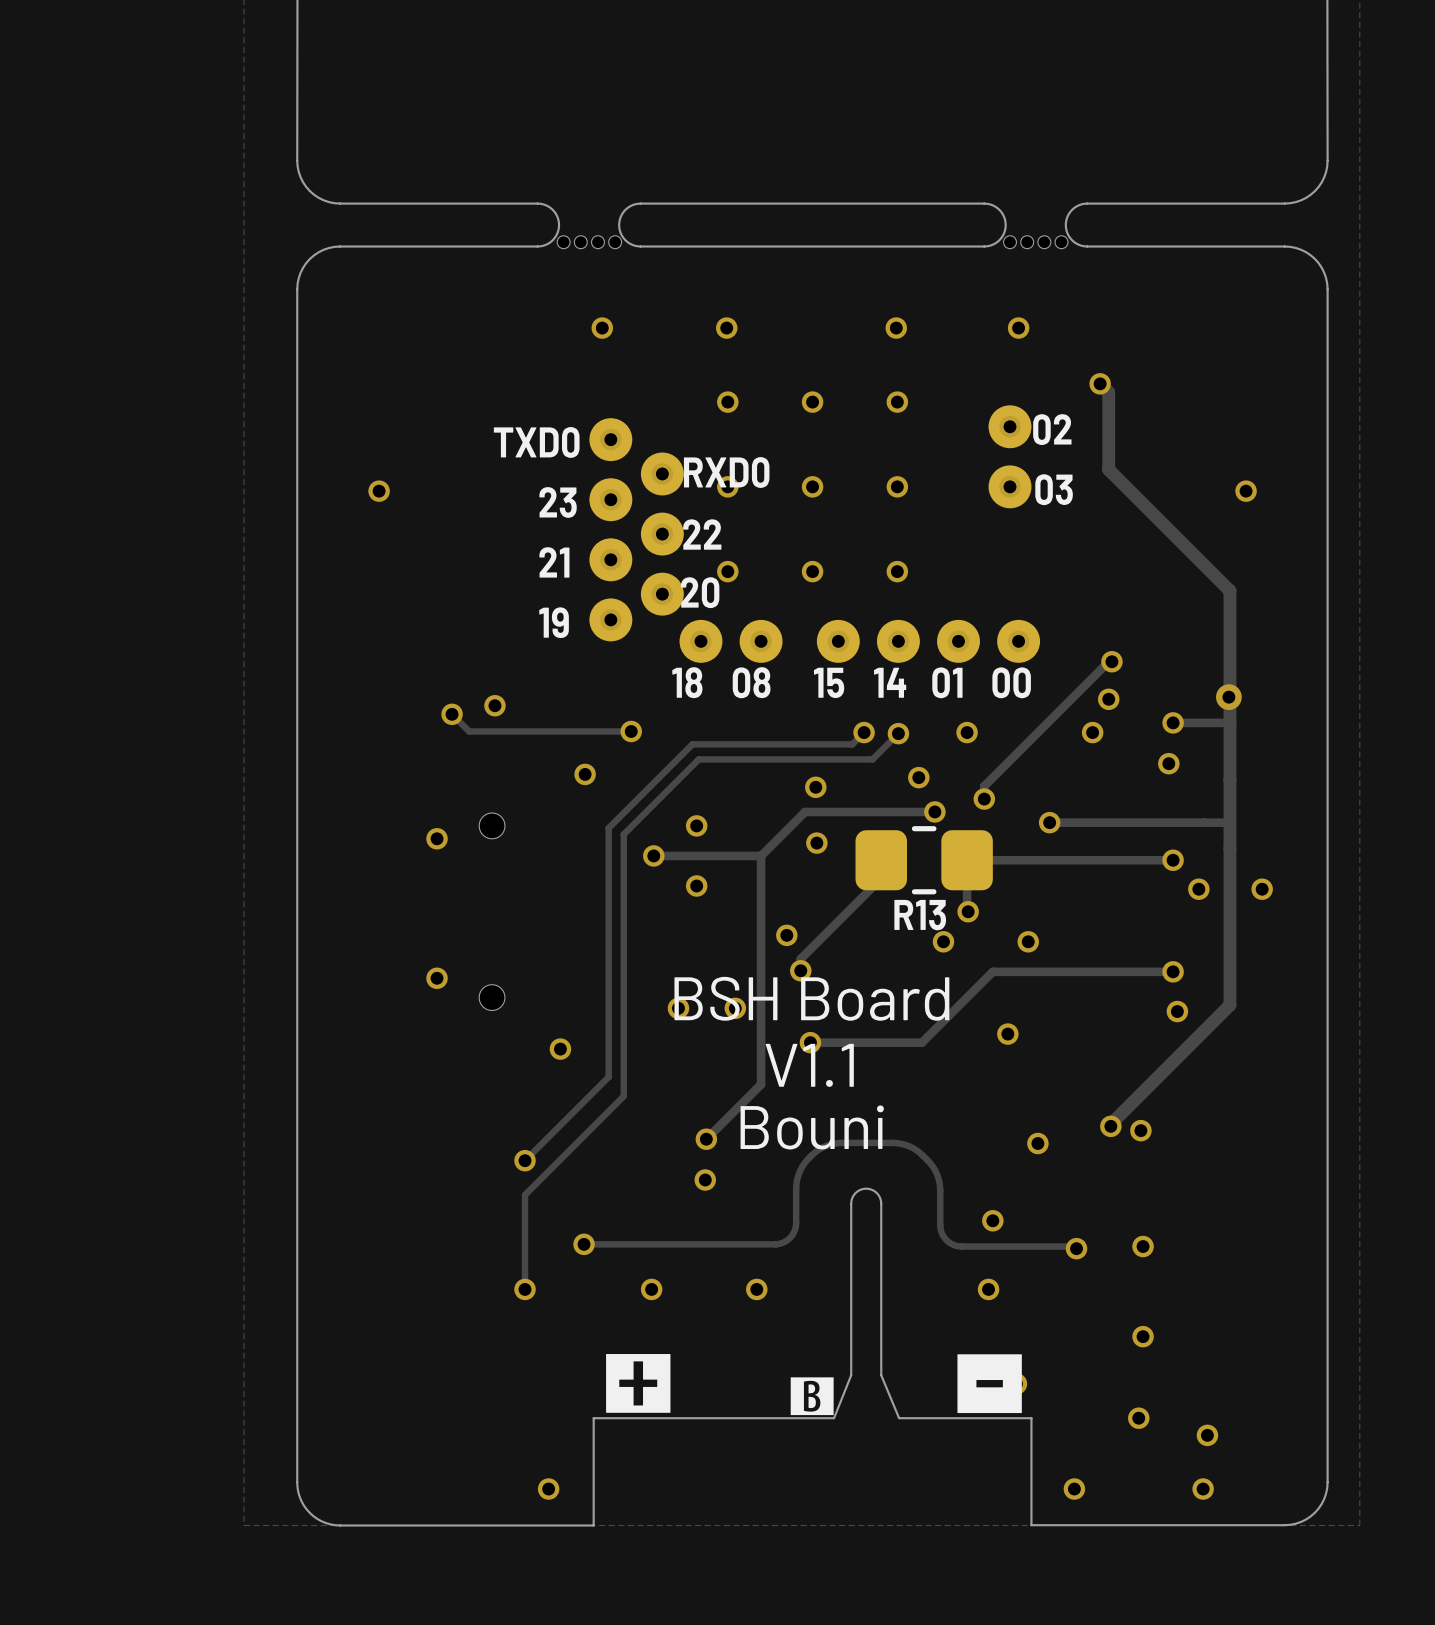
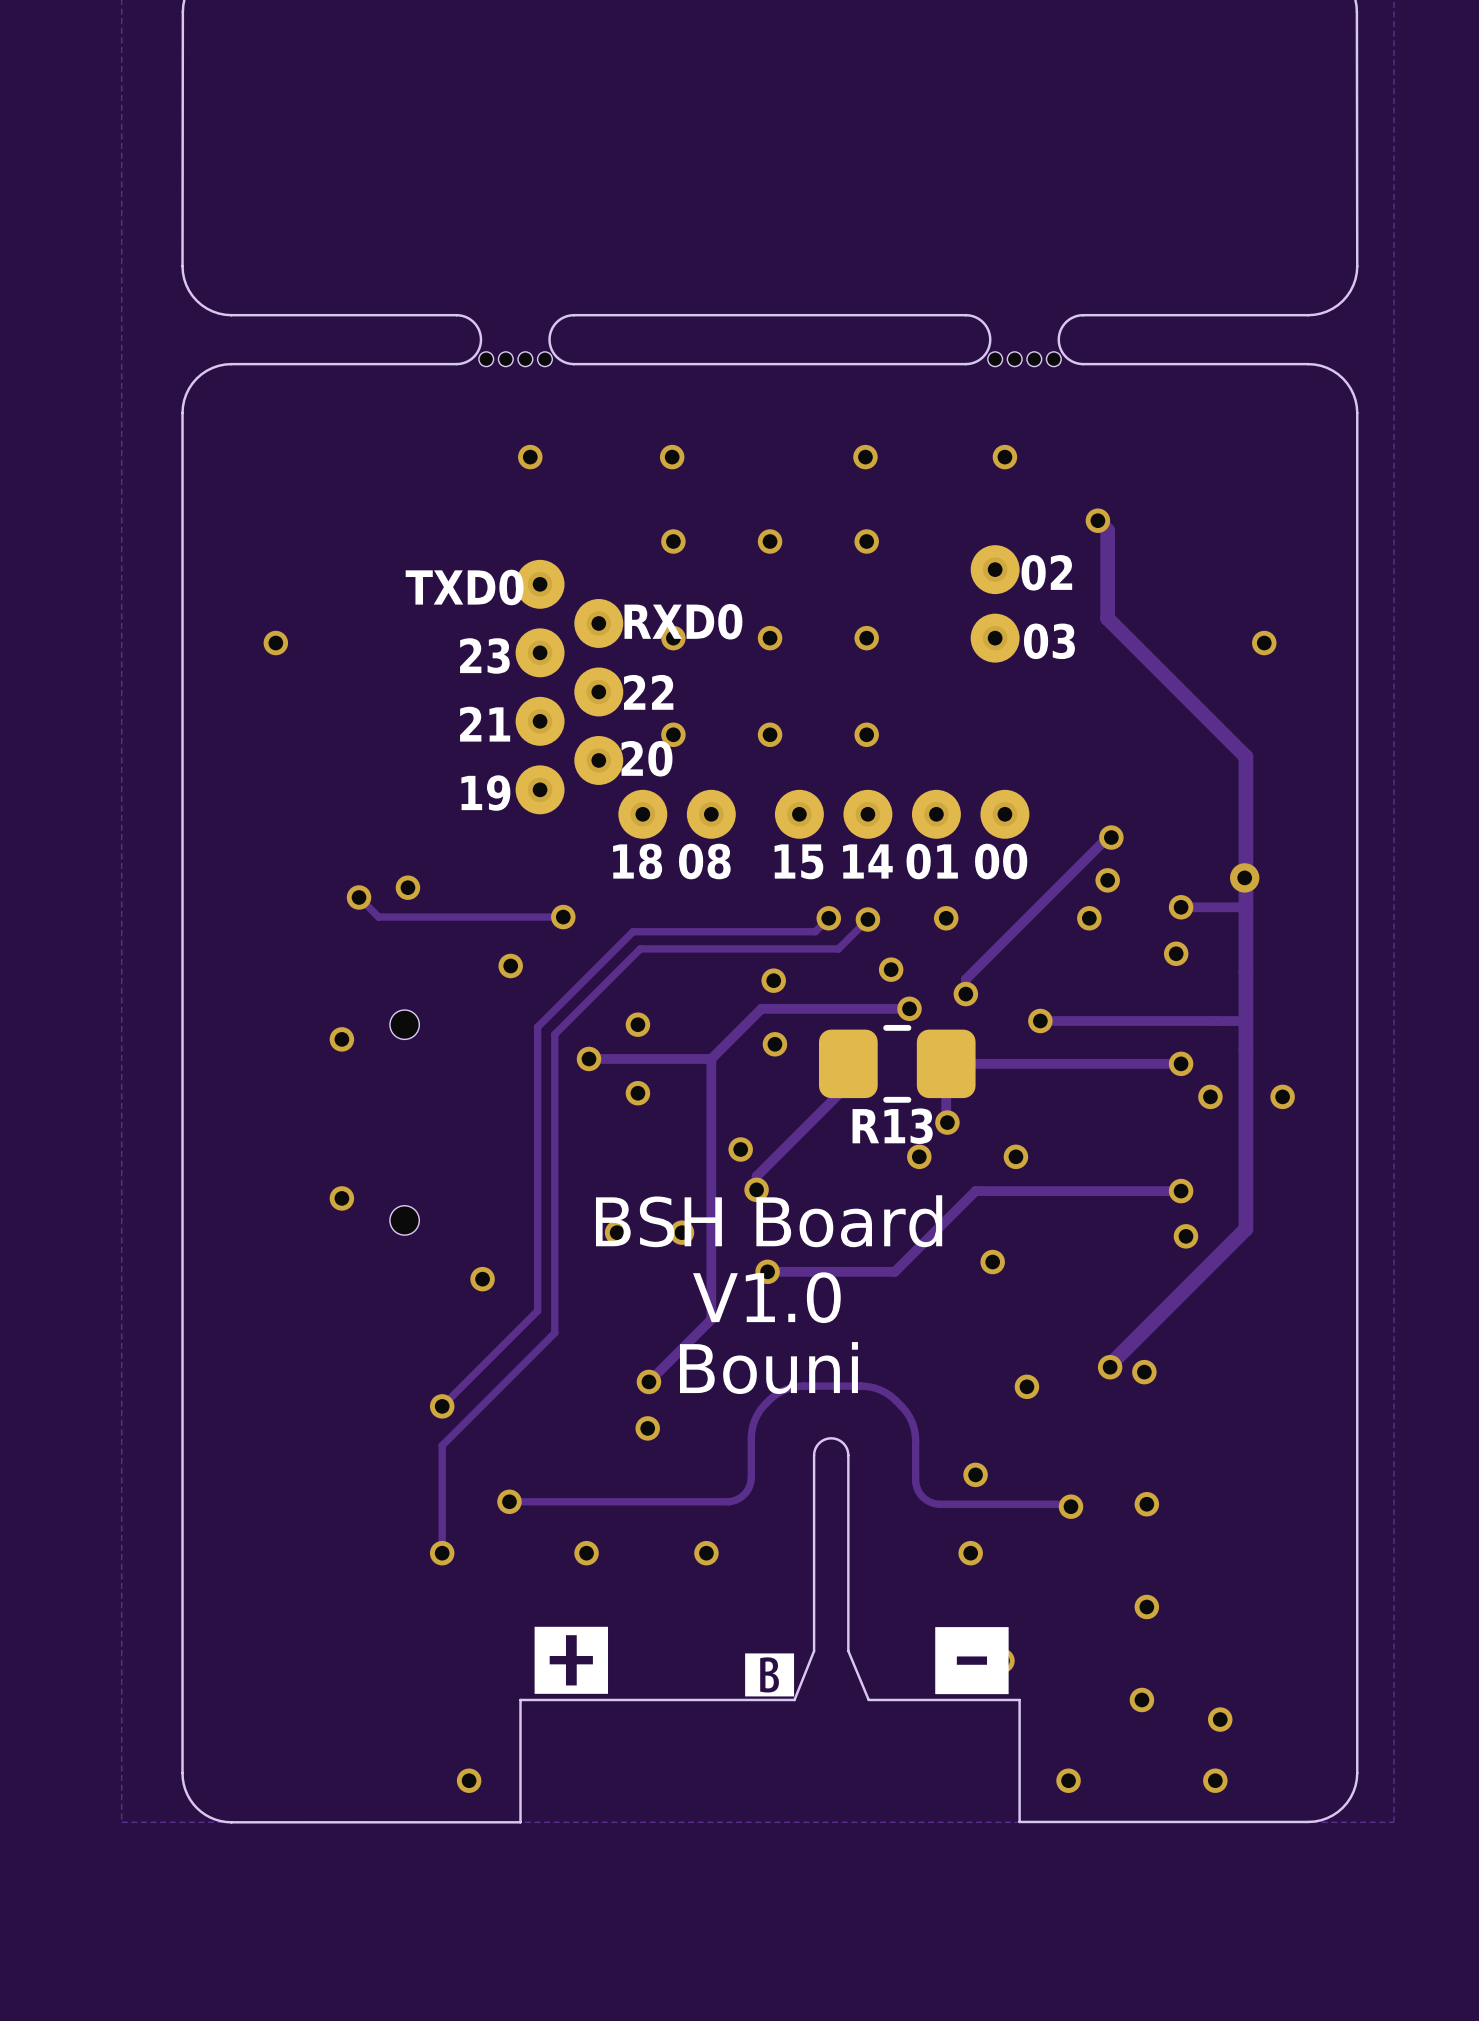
text: V1.1 (809, 1065) -> V1.0 (766, 1297)

